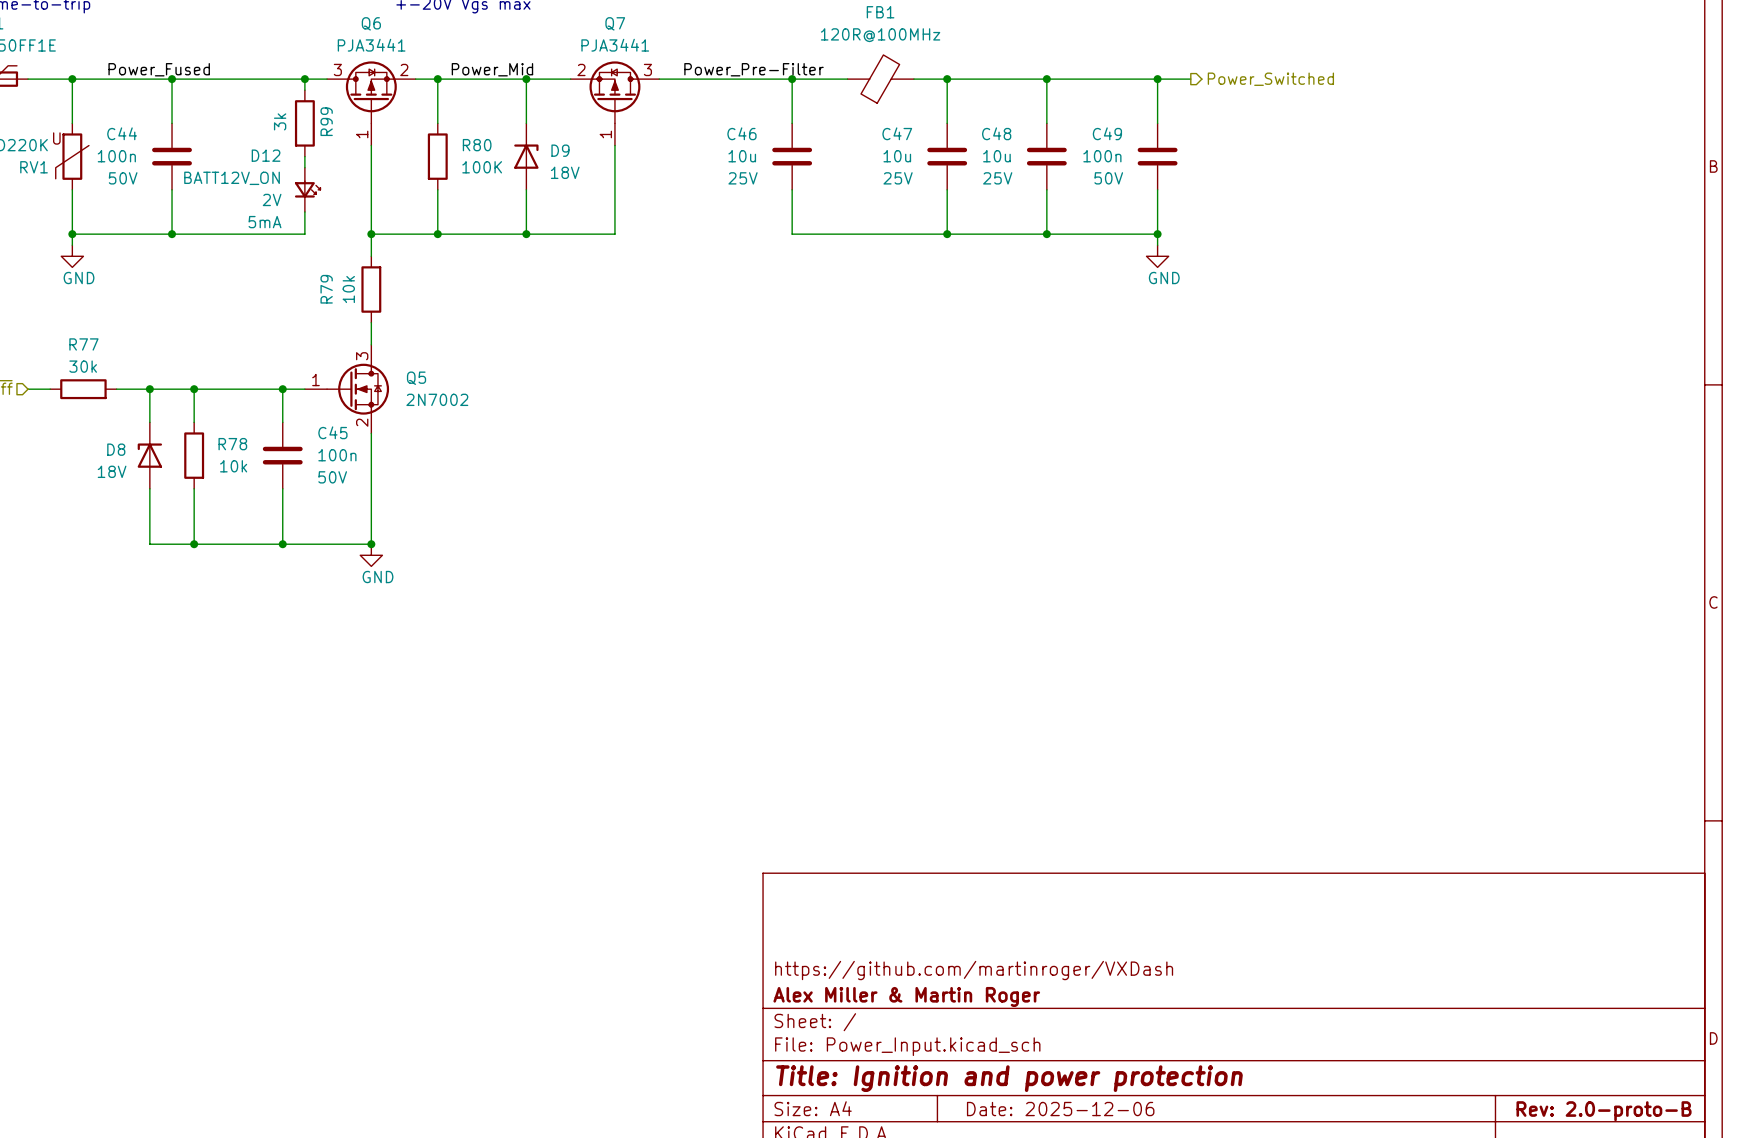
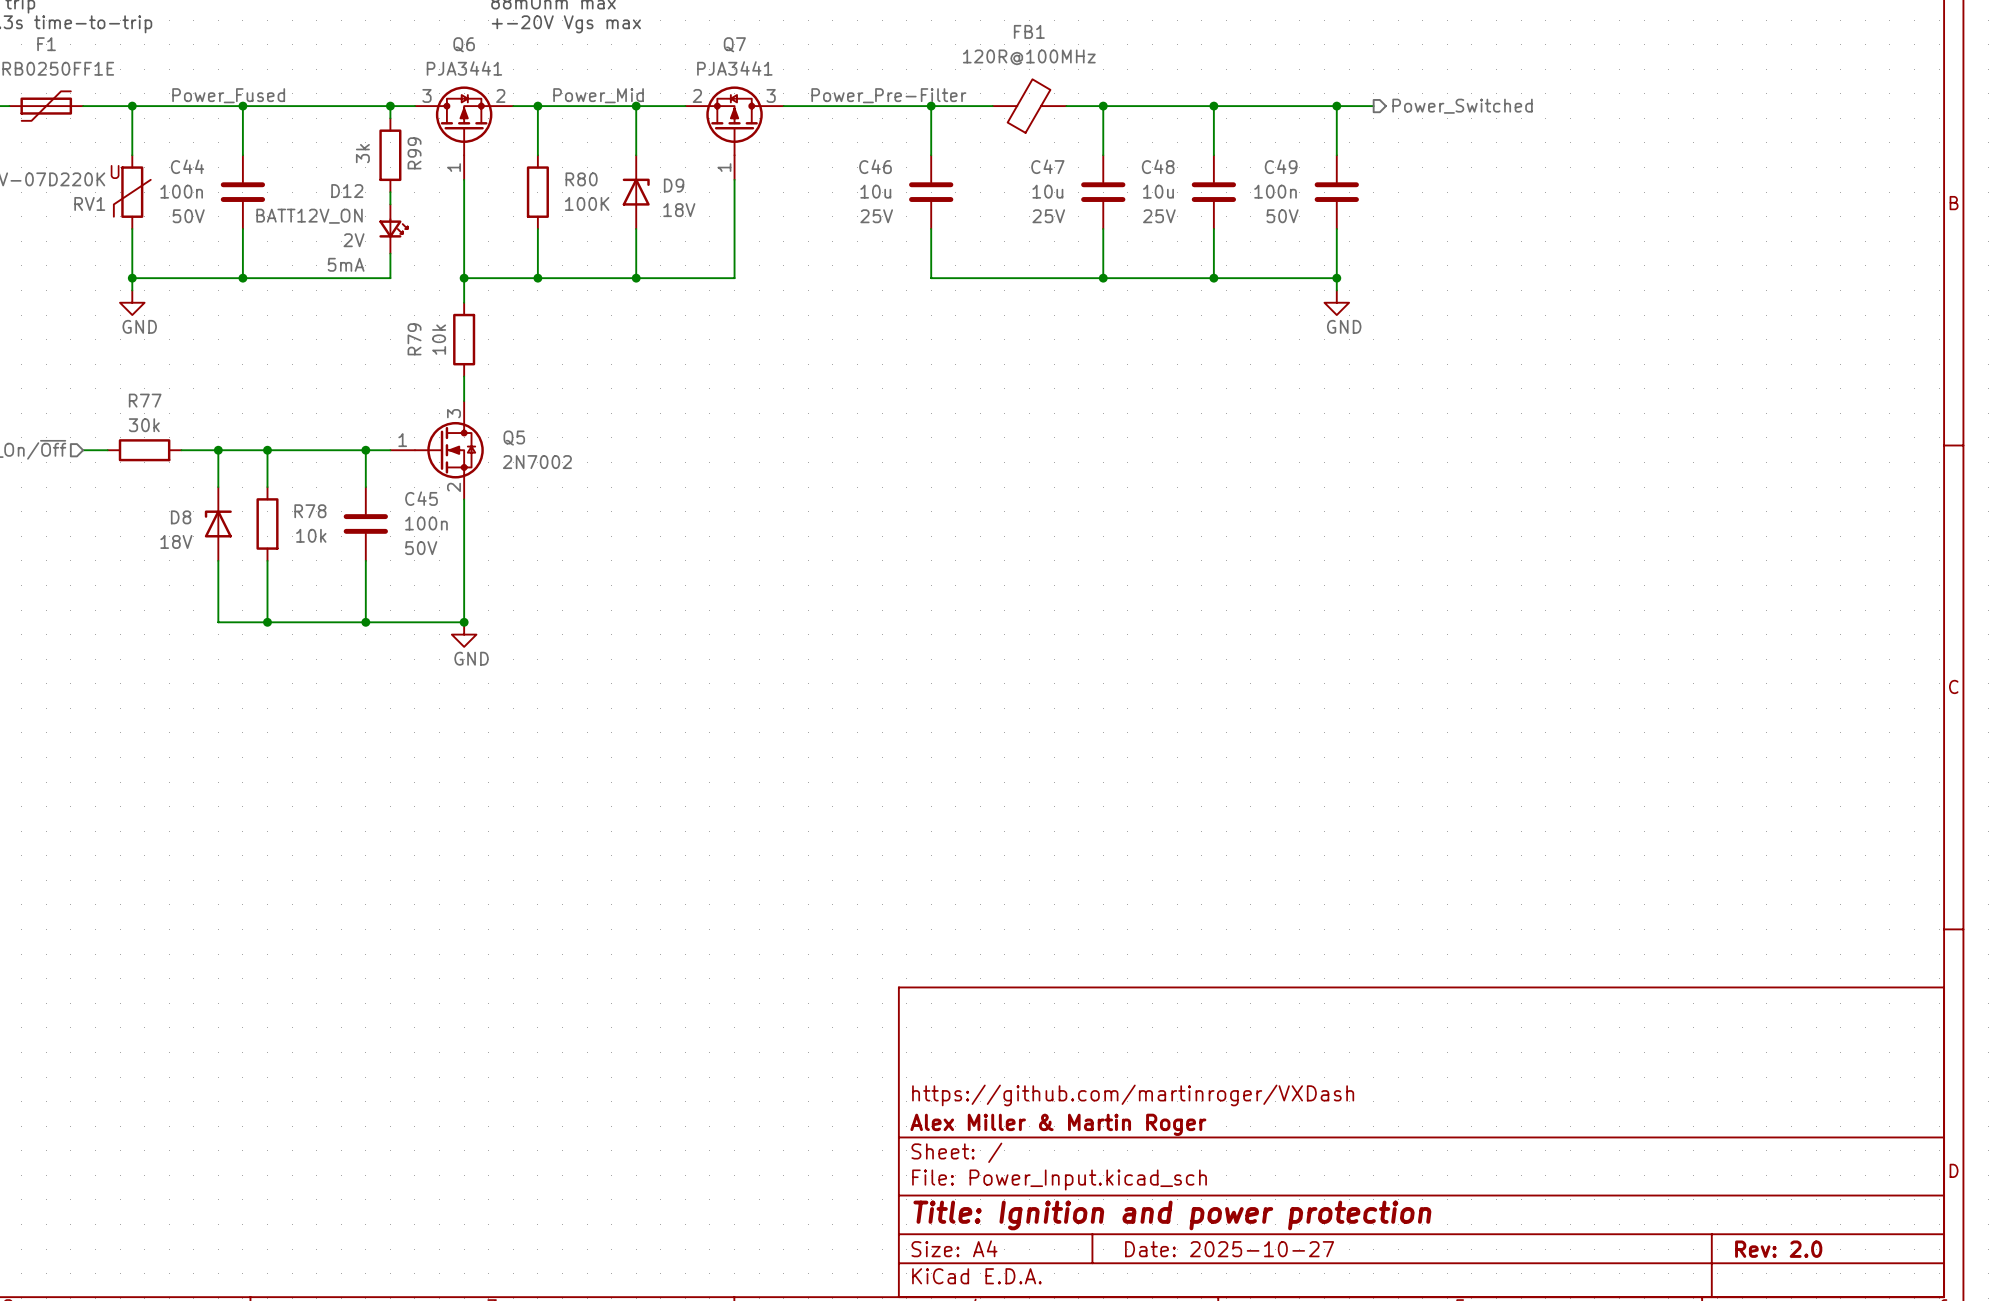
title block: Date: 2025-12-06 (1060, 1109) -> Date: 2025-10-27 (1229, 1249)
title block: Rev: 2.0-proto-B (1604, 1111) -> Rev: 2.0 (1778, 1249)

